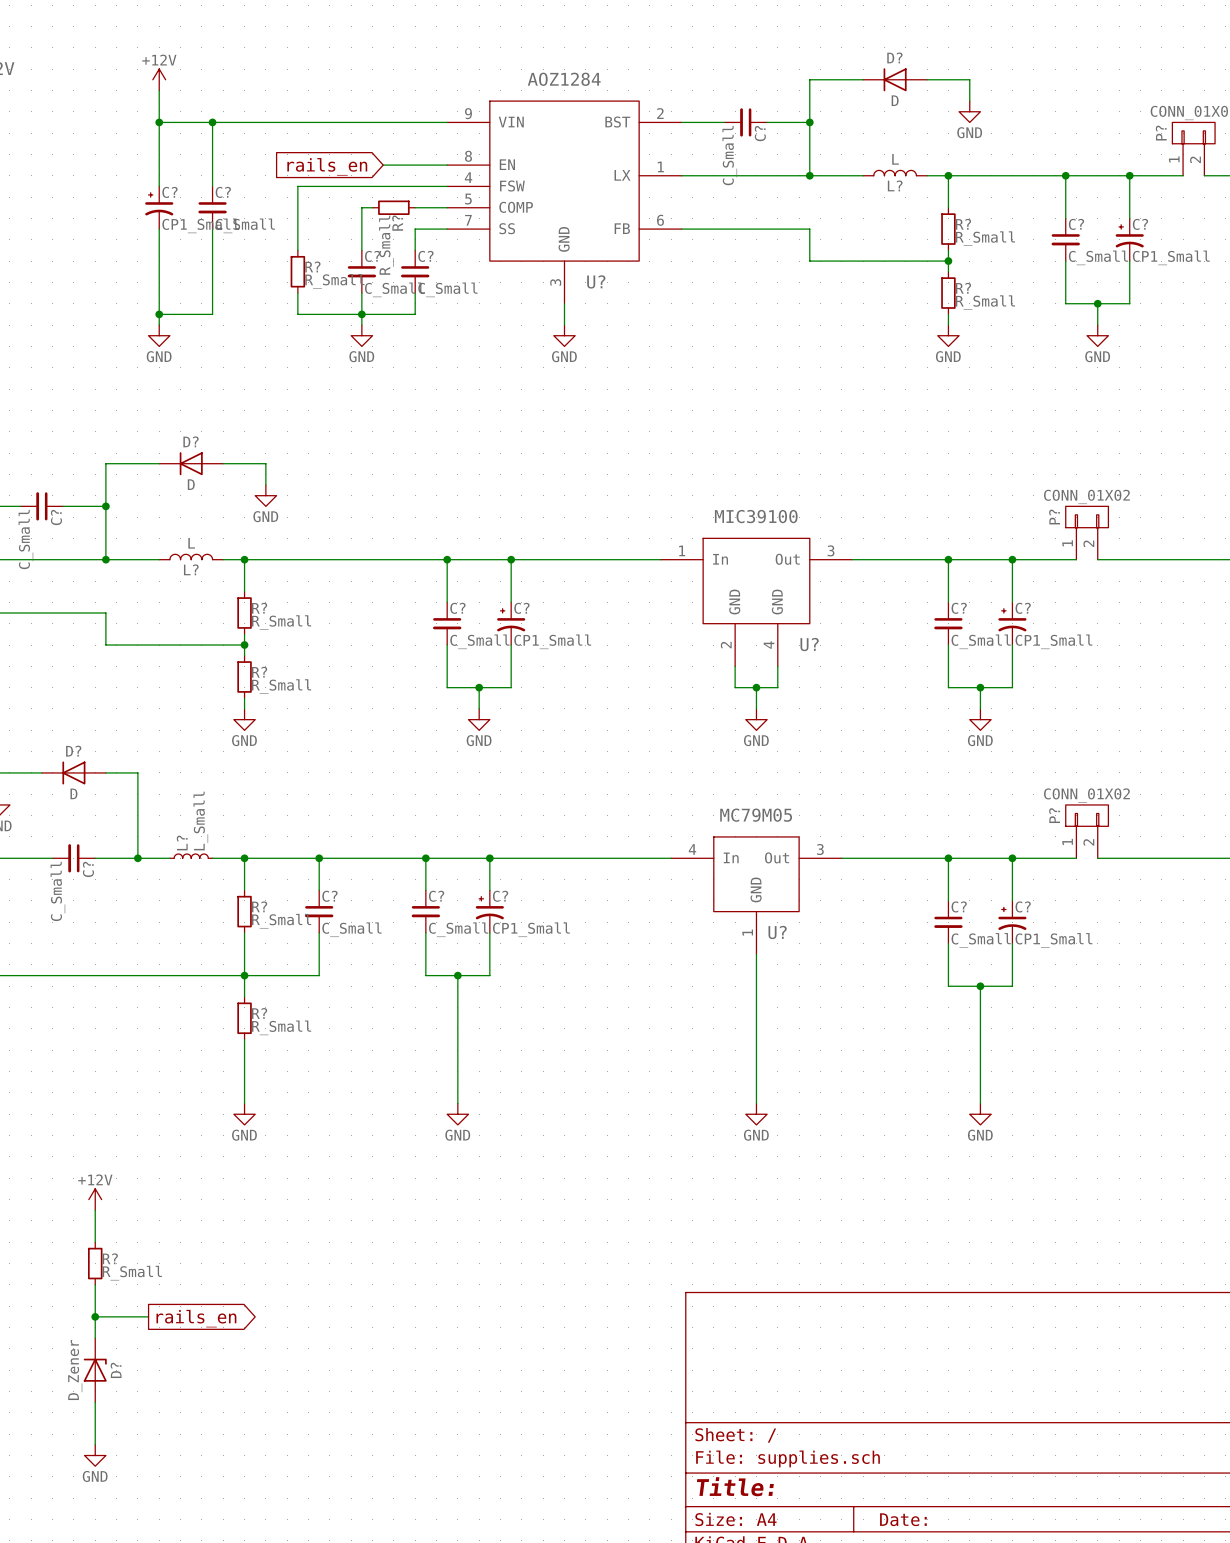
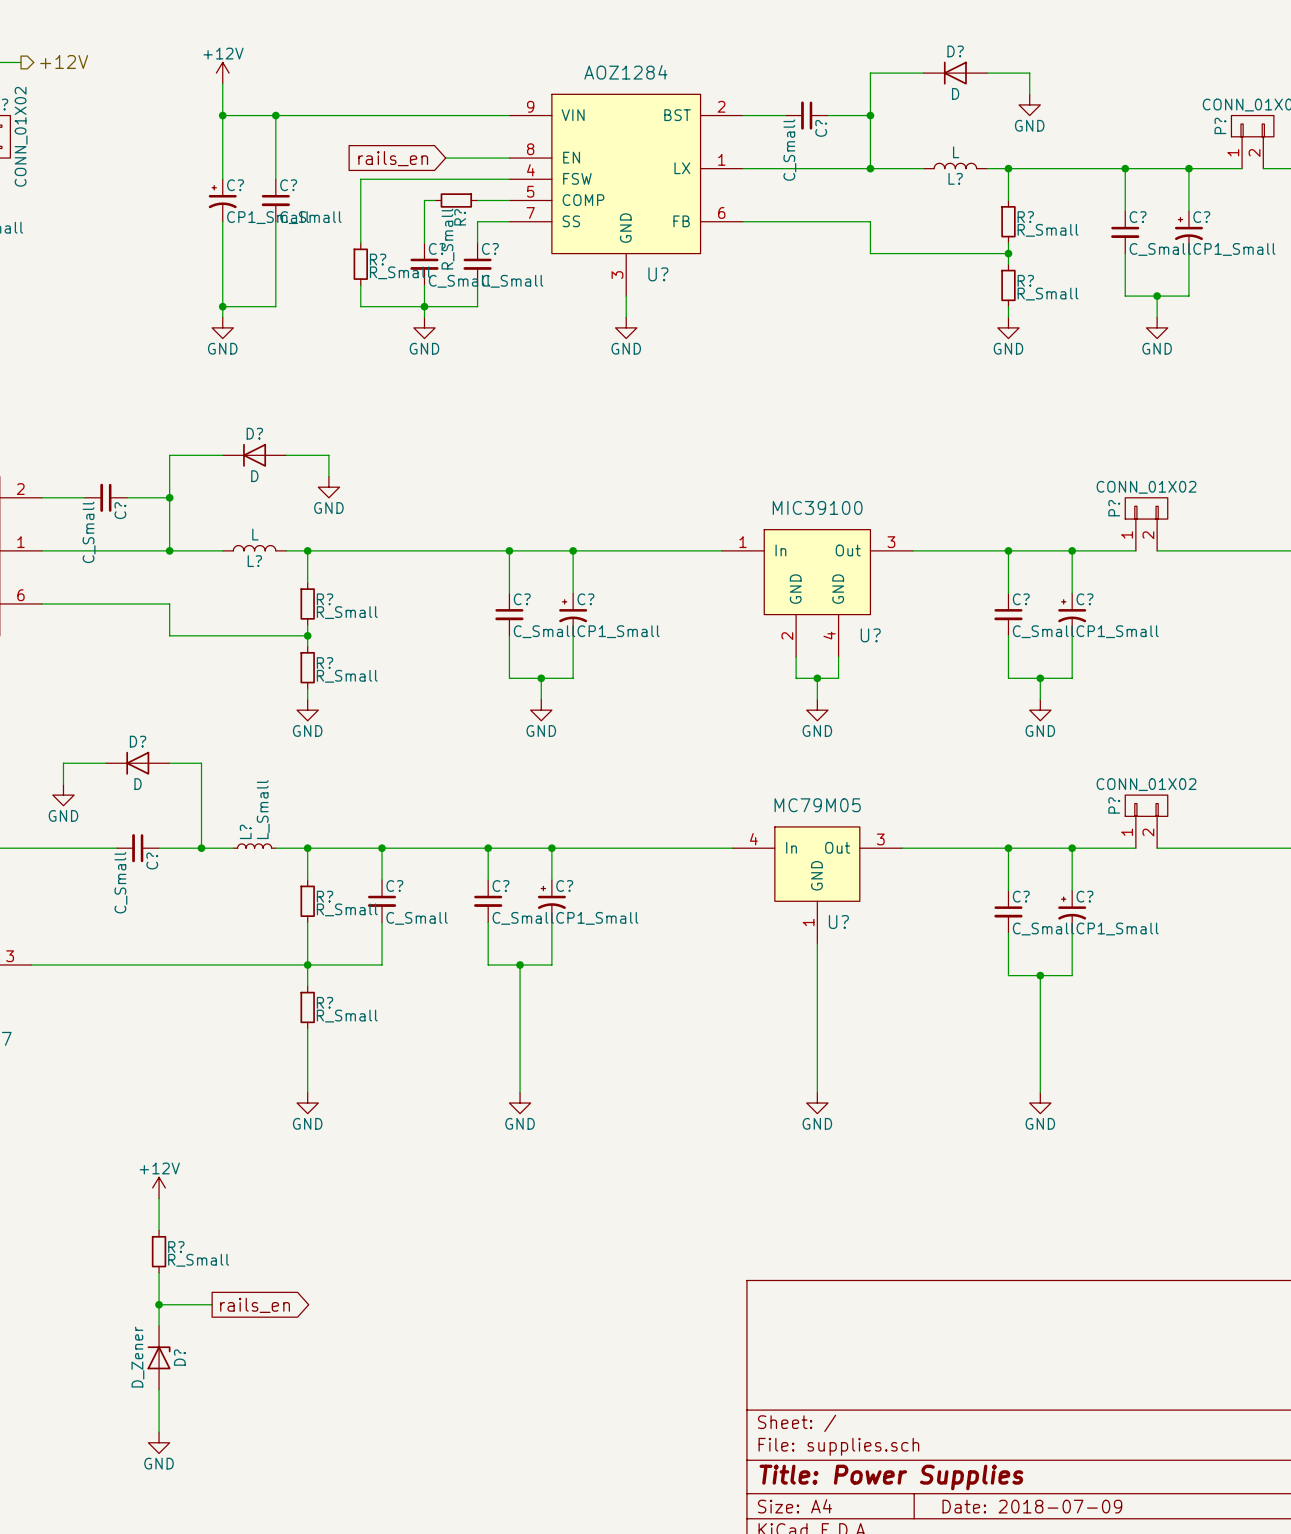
title block: Title: (735, 1486) -> Title: Power Supplies (891, 1477)
title block: Date: (903, 1519) -> Date: 2018-07-09 (1032, 1506)

